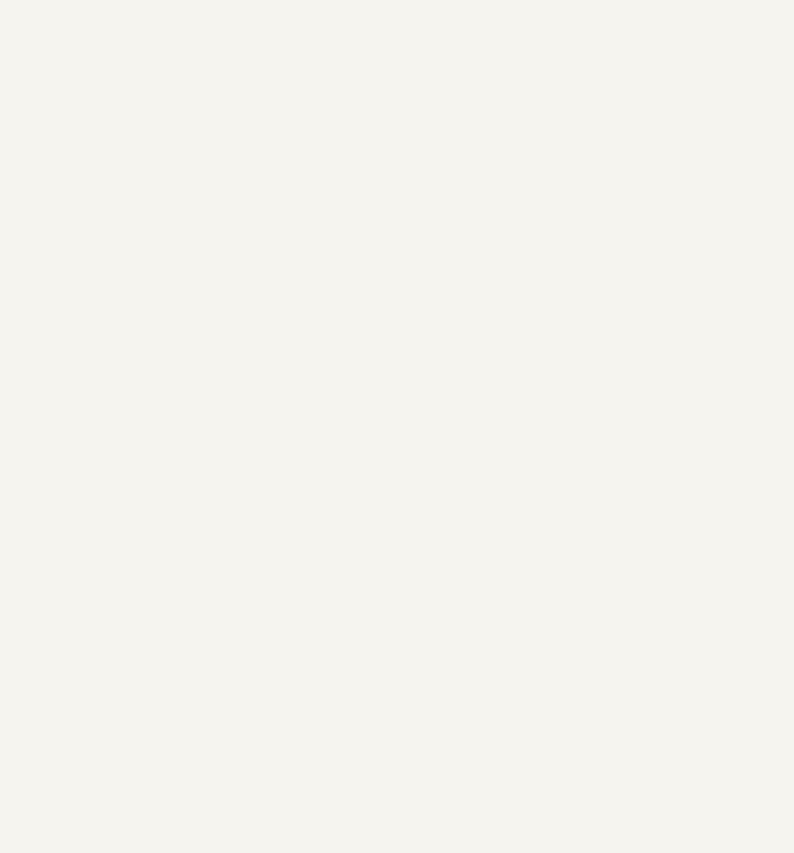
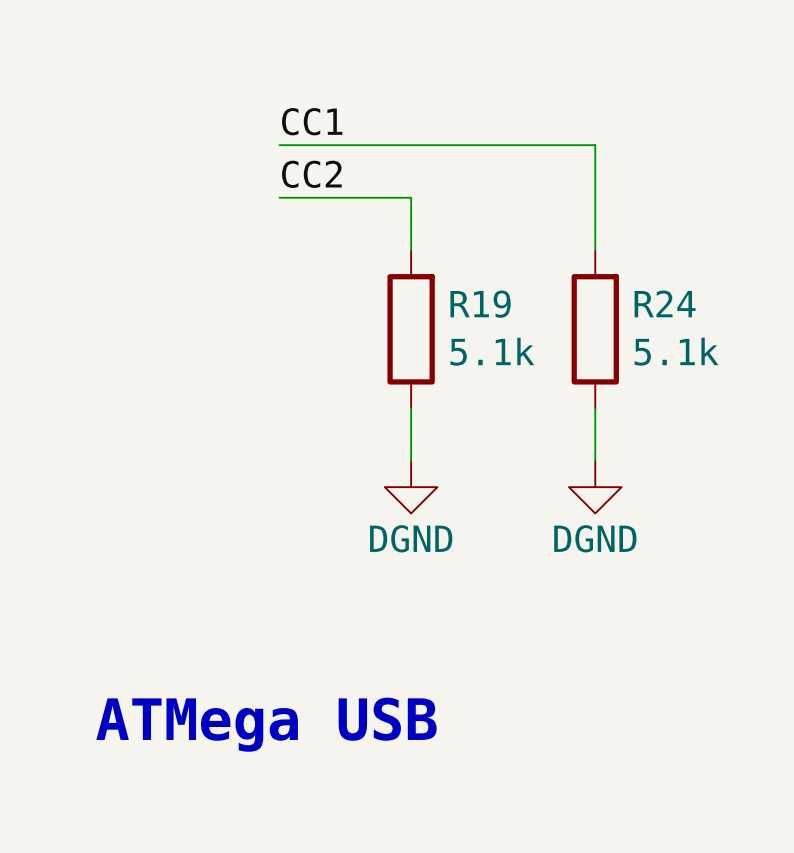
label: none -> CC1 (312, 121)
wire: none -> (279, 145) (595, 145) (595, 250)
label: none -> CC2 (311, 174)
wire: none -> (279, 197) (411, 197) (411, 250)
R19: none -> 5.1k (411, 329)
R24: none -> 5.1k (595, 329)
wire: none -> (411, 408) (411, 460)
wire: none -> (595, 408) (595, 460)
power symbol: none -> DGND (411, 487)
power symbol: none -> DGND (595, 487)
text: none -> ATMega USB (266, 724)

